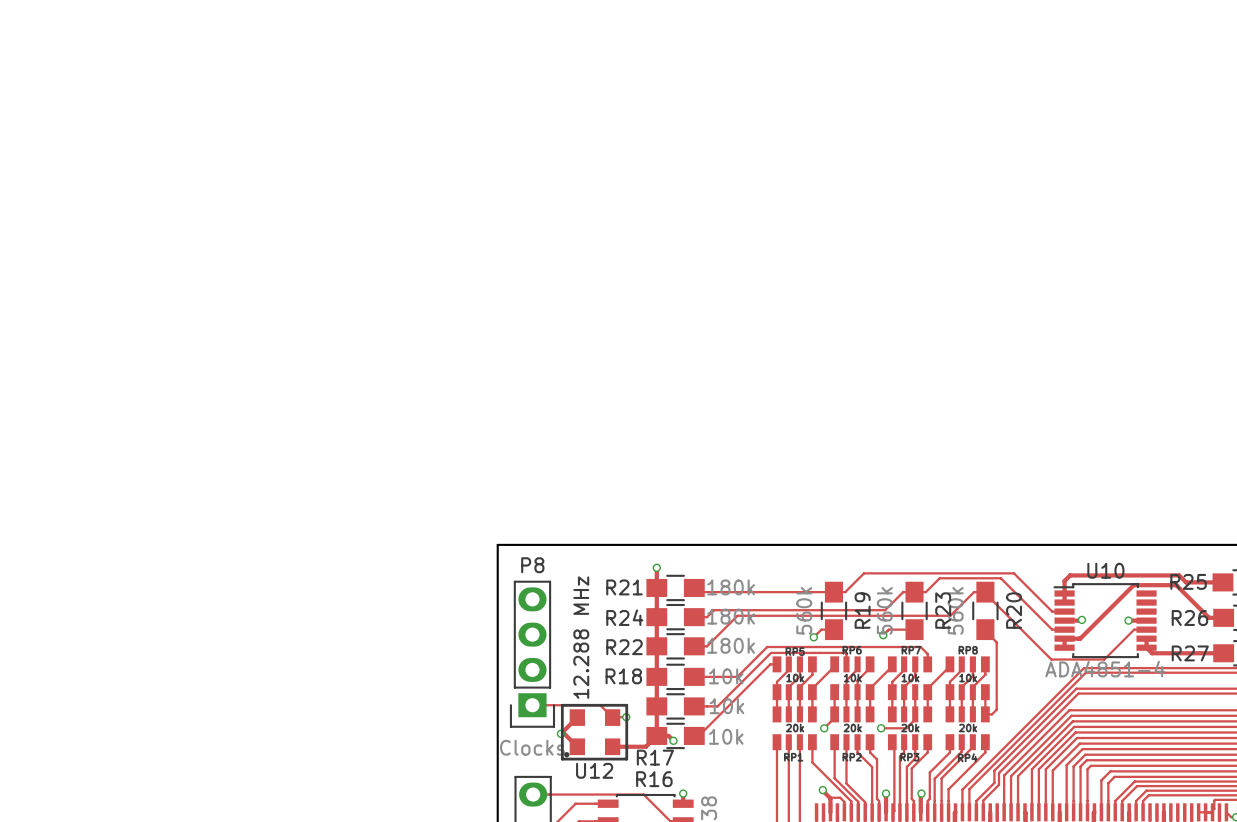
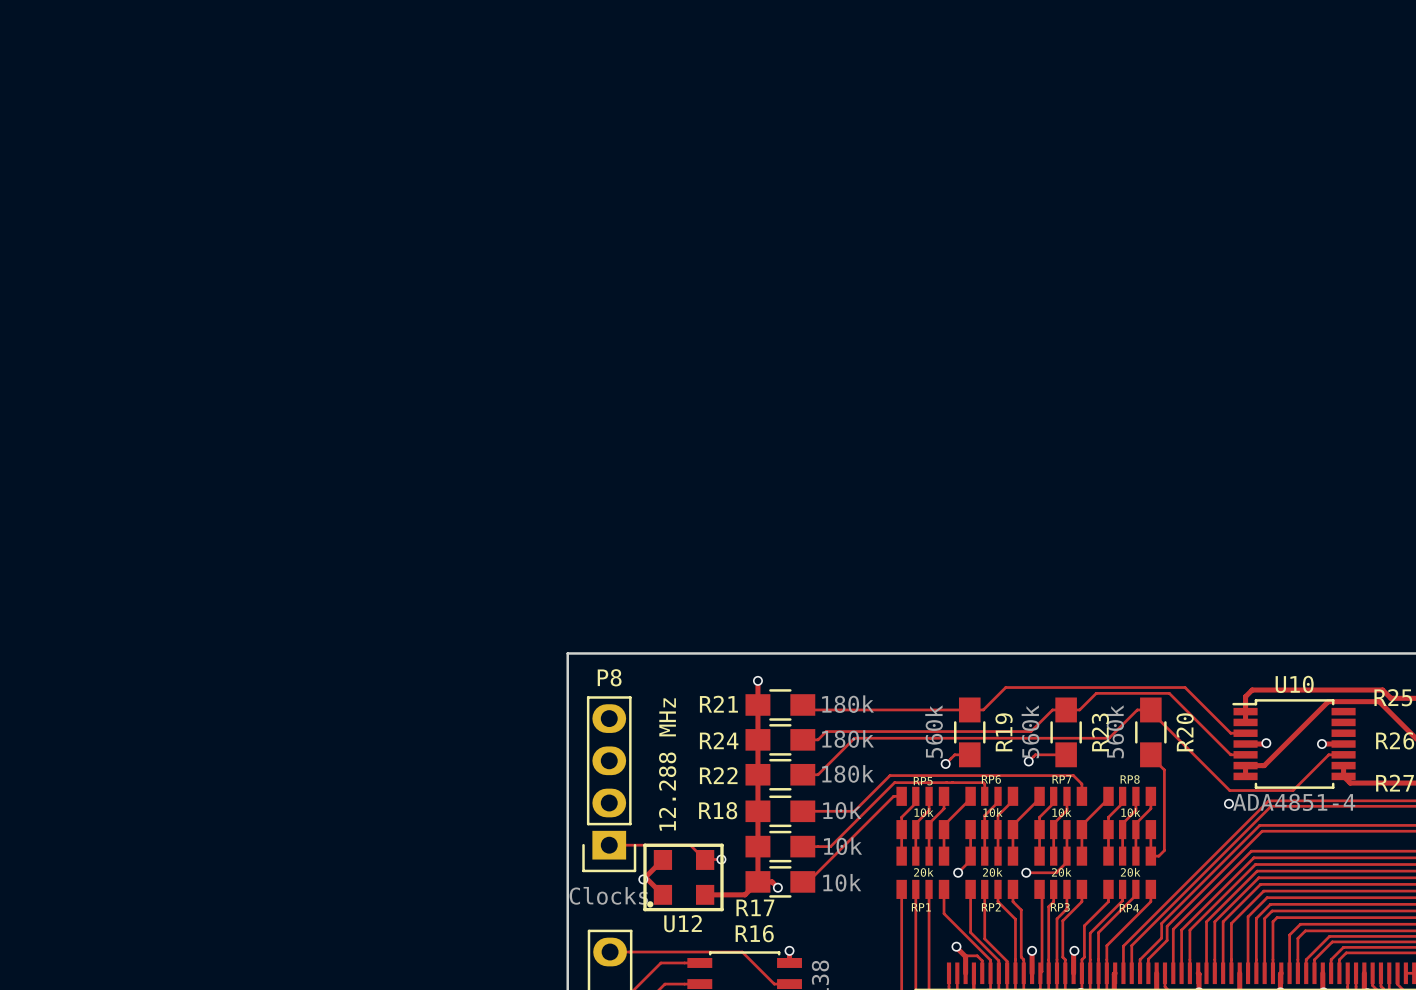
via: none -> (1228, 803)

